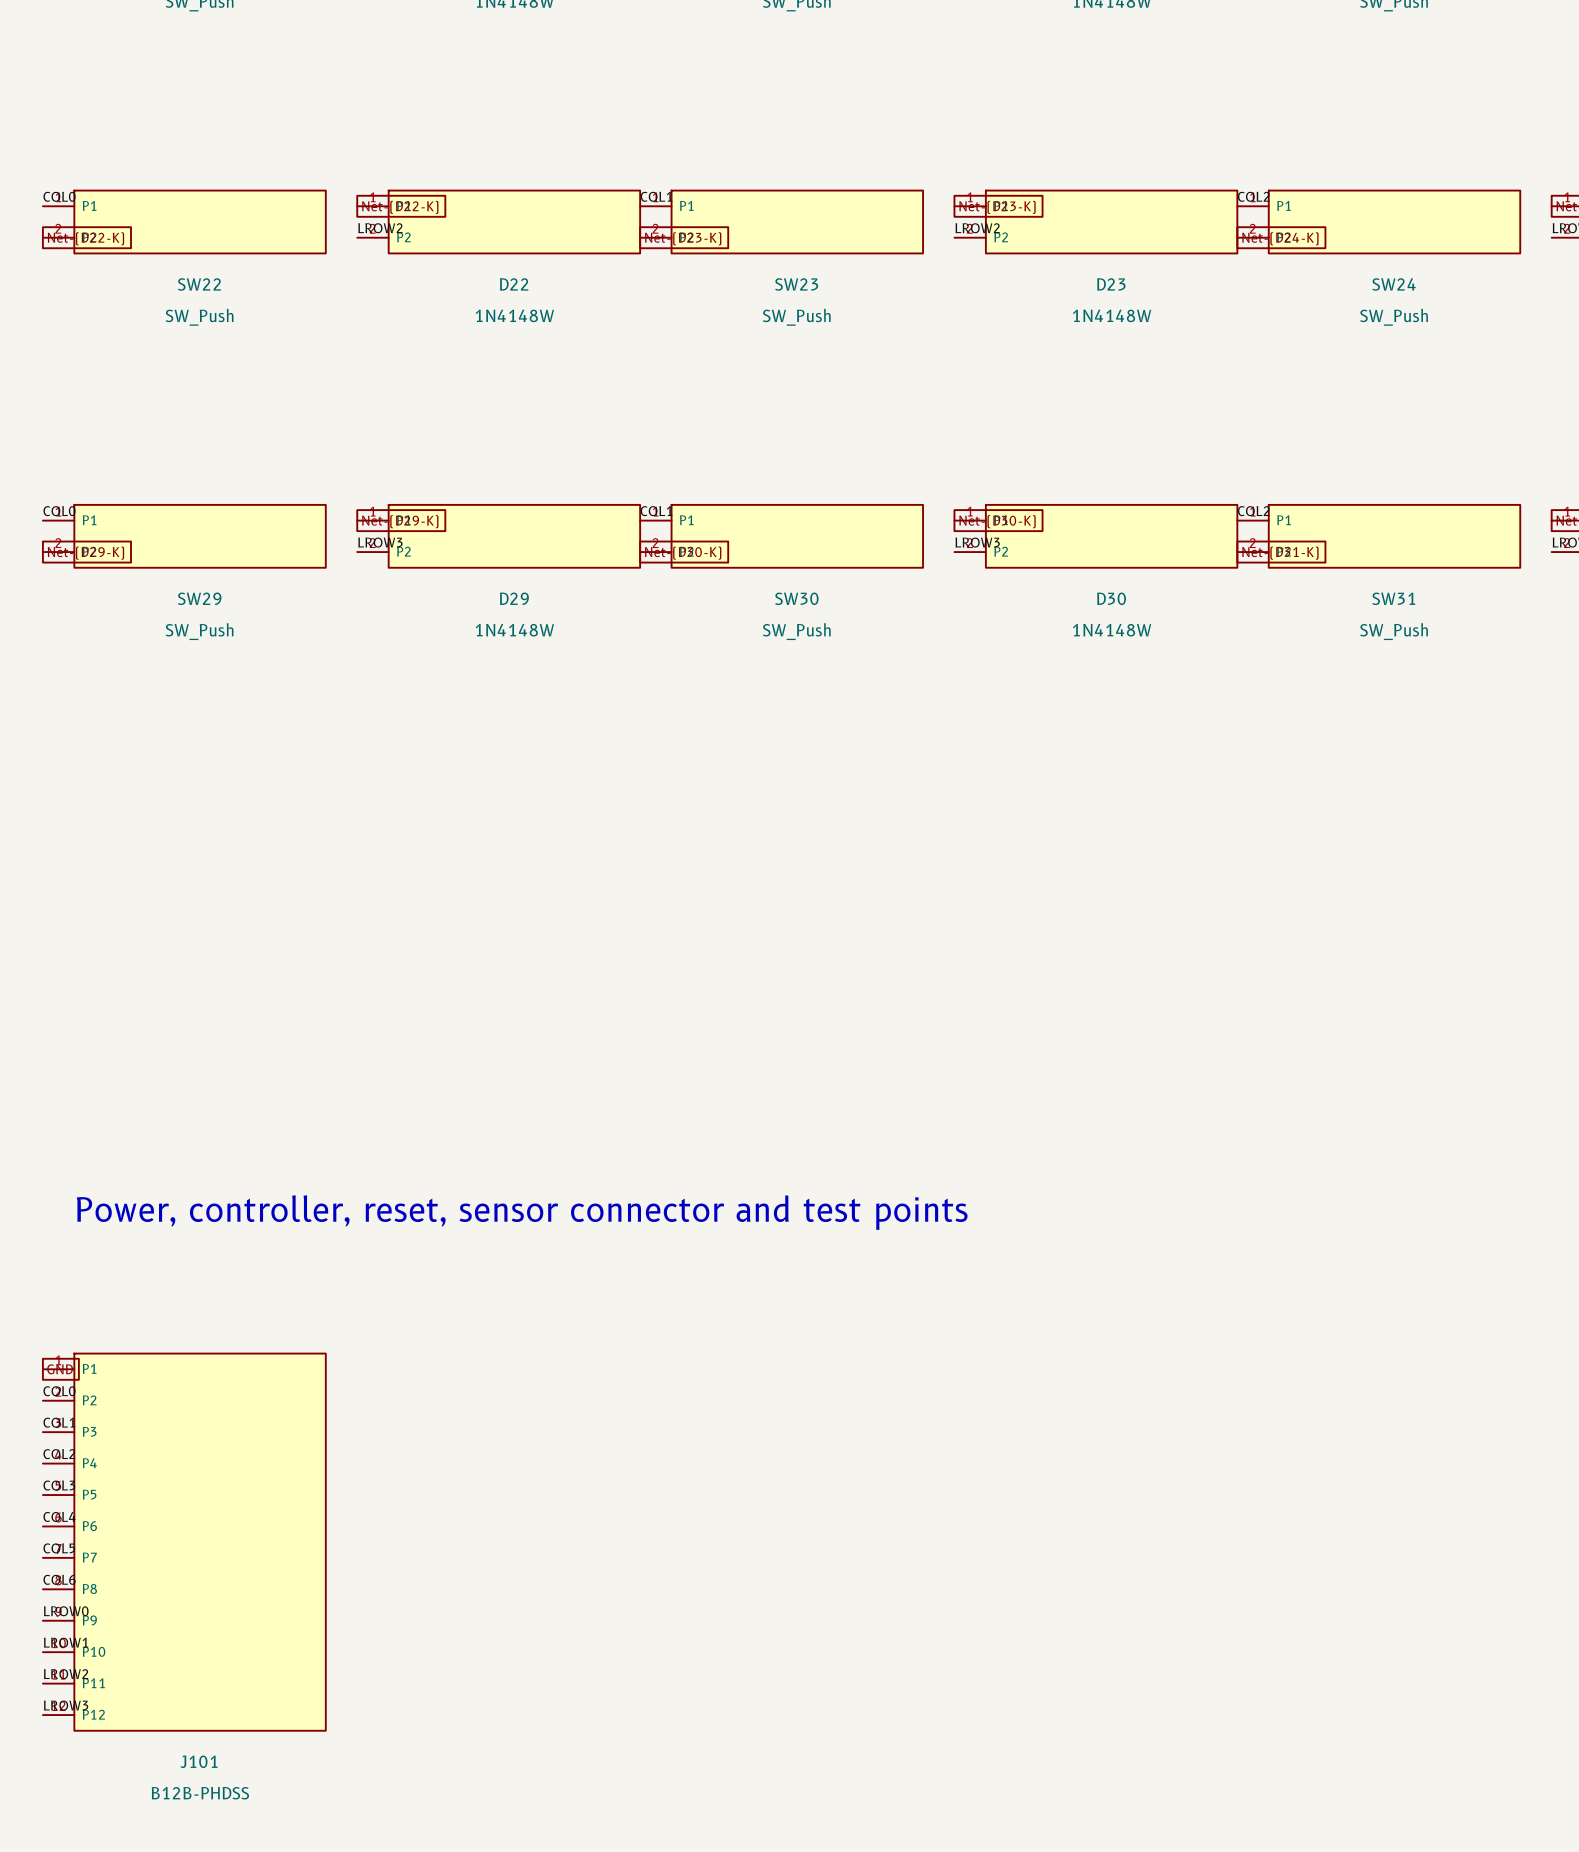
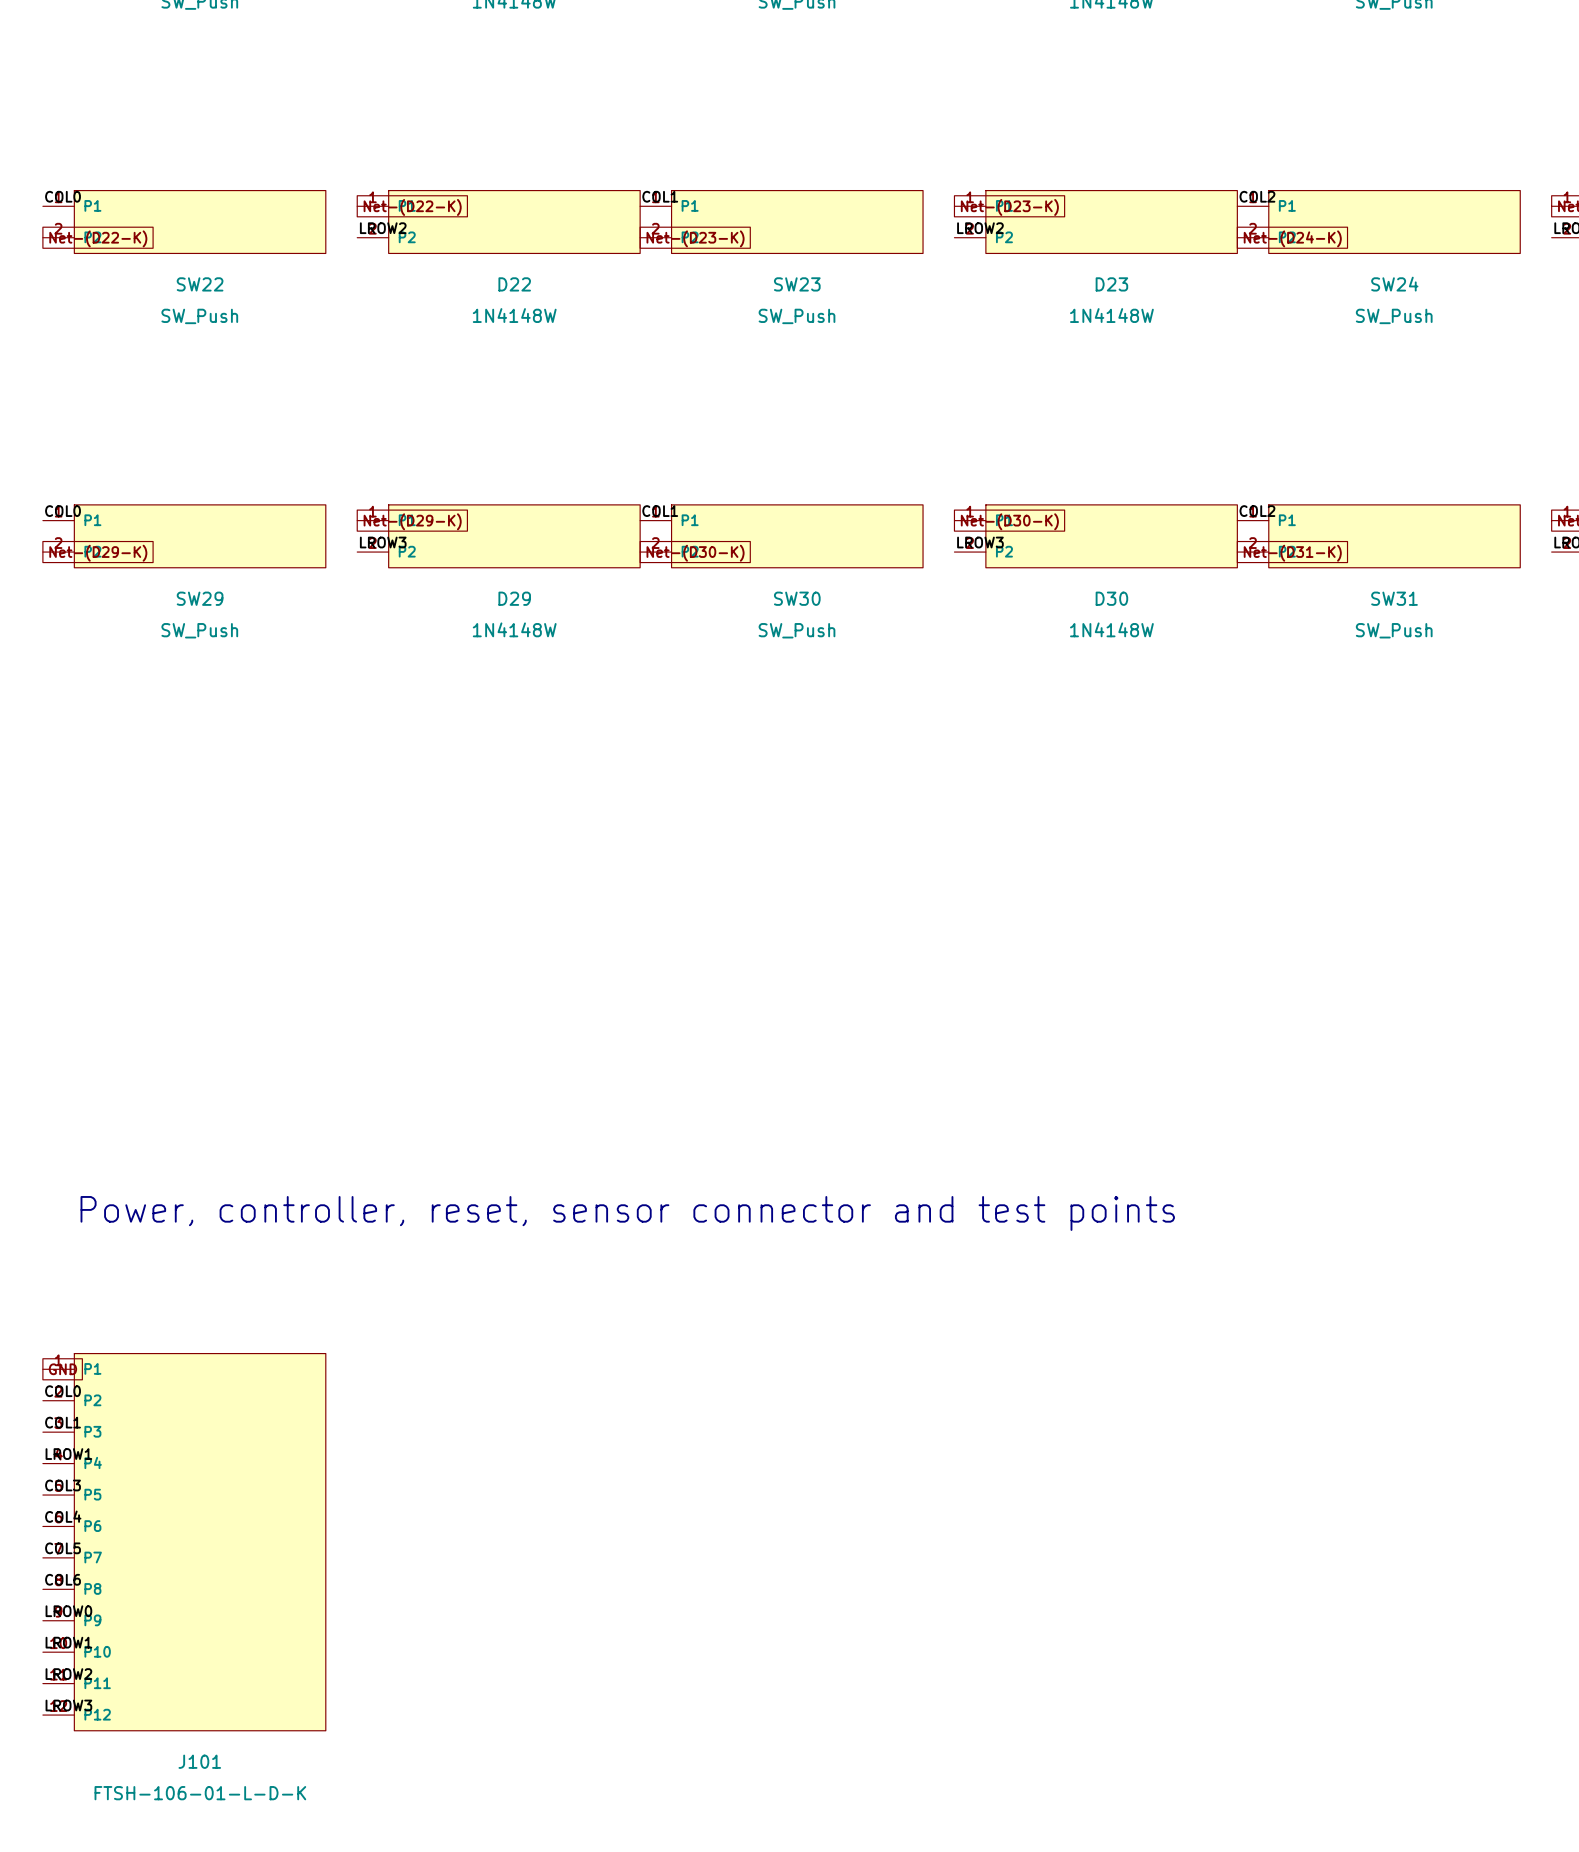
label: COL2 (59, 1454) -> LROW1 (68, 1454)
J101 value: B12B-PHDSS (200, 1793) -> FTSH-106-01-L-D-K (200, 1793)

